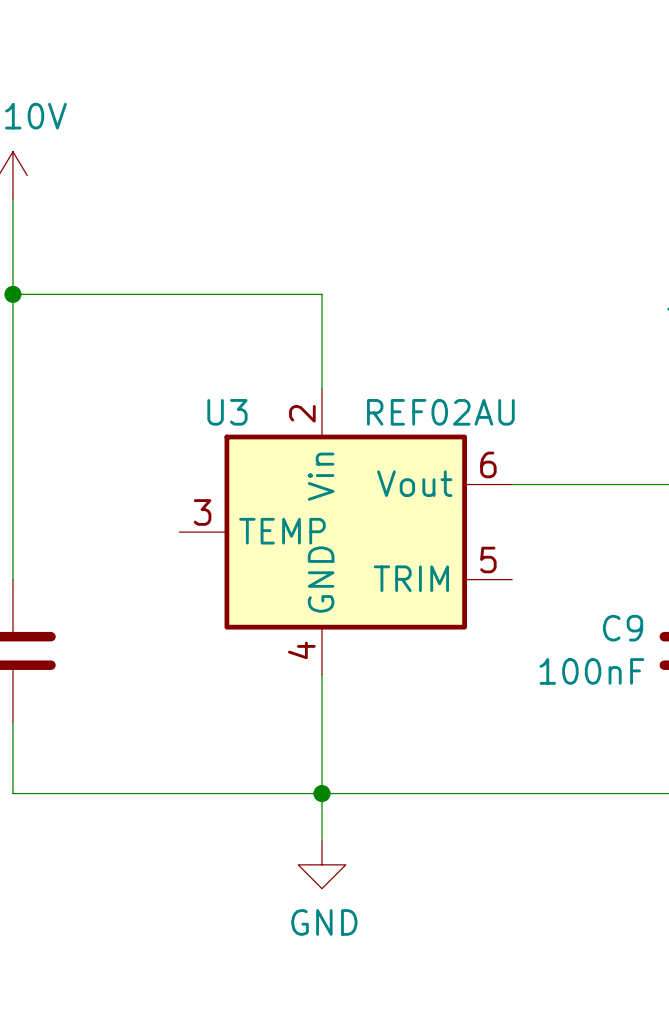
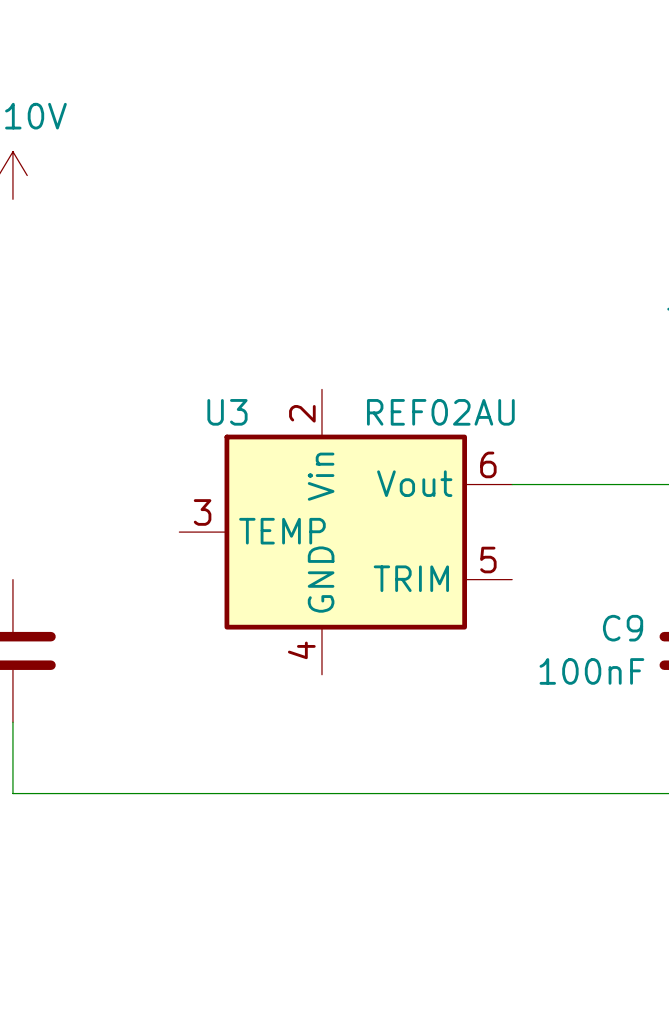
wire: (12, 199) (12, 579) -> none
wire: (12, 294) (321, 294) (321, 389) -> none
junction: (12, 294) -> none
wire: (321, 674) (321, 841) -> none
junction: (321, 793) -> none
power symbol: GND (321, 864) -> none

